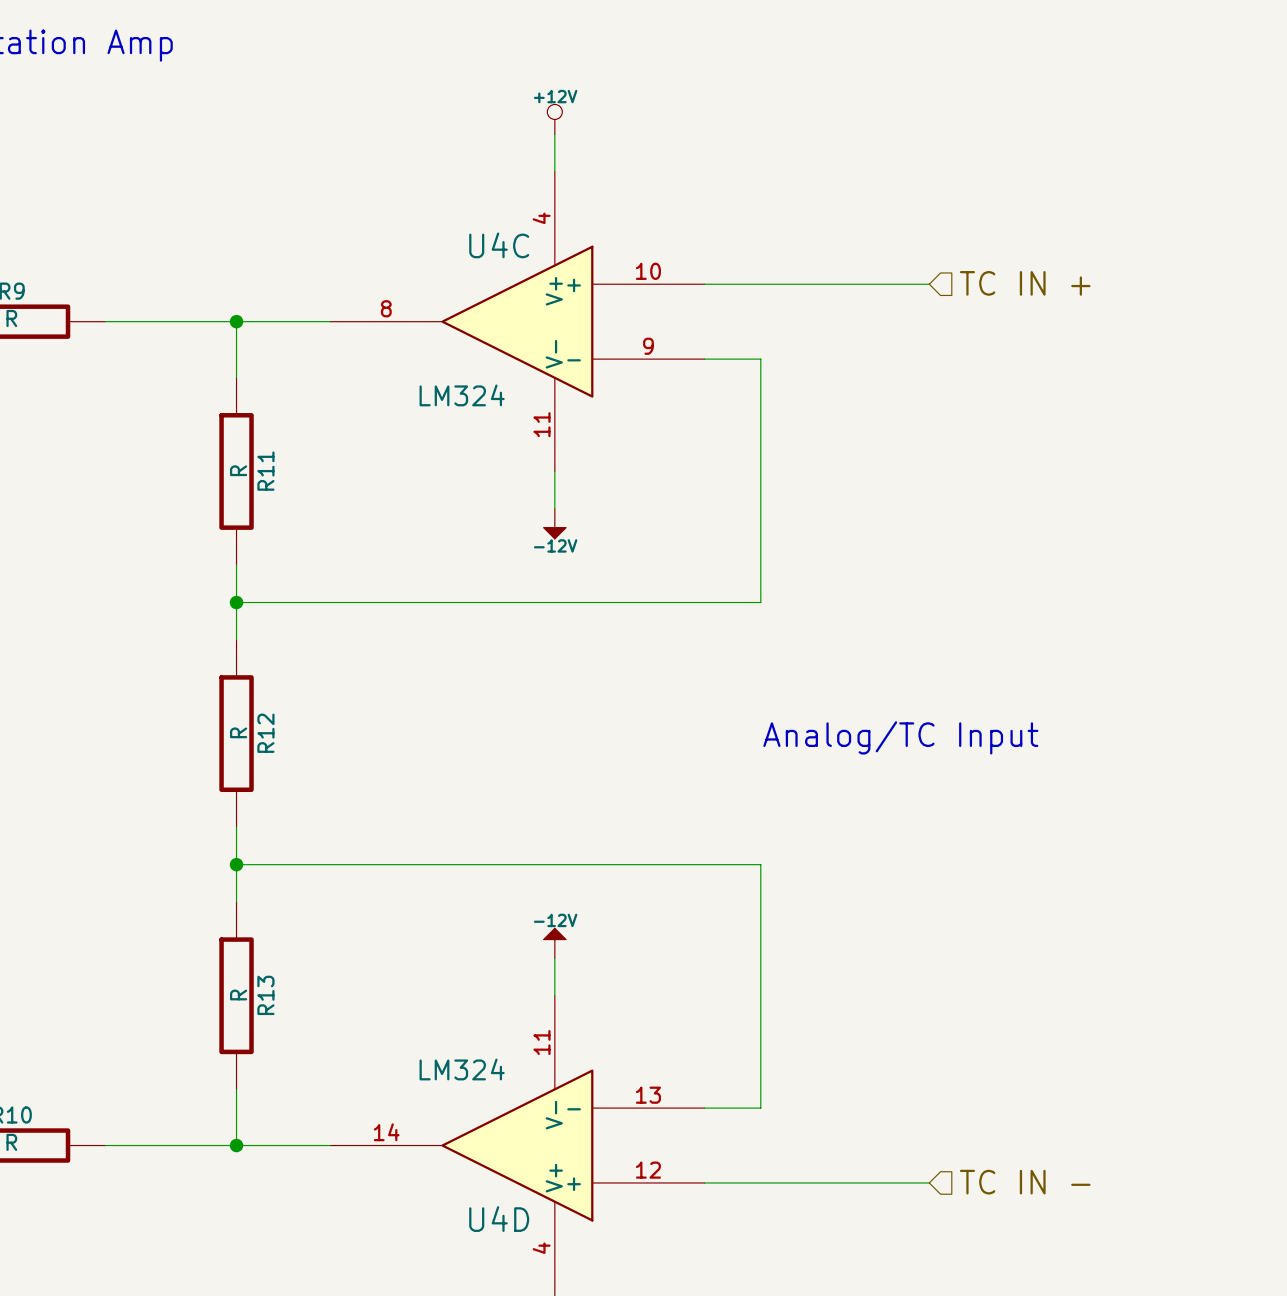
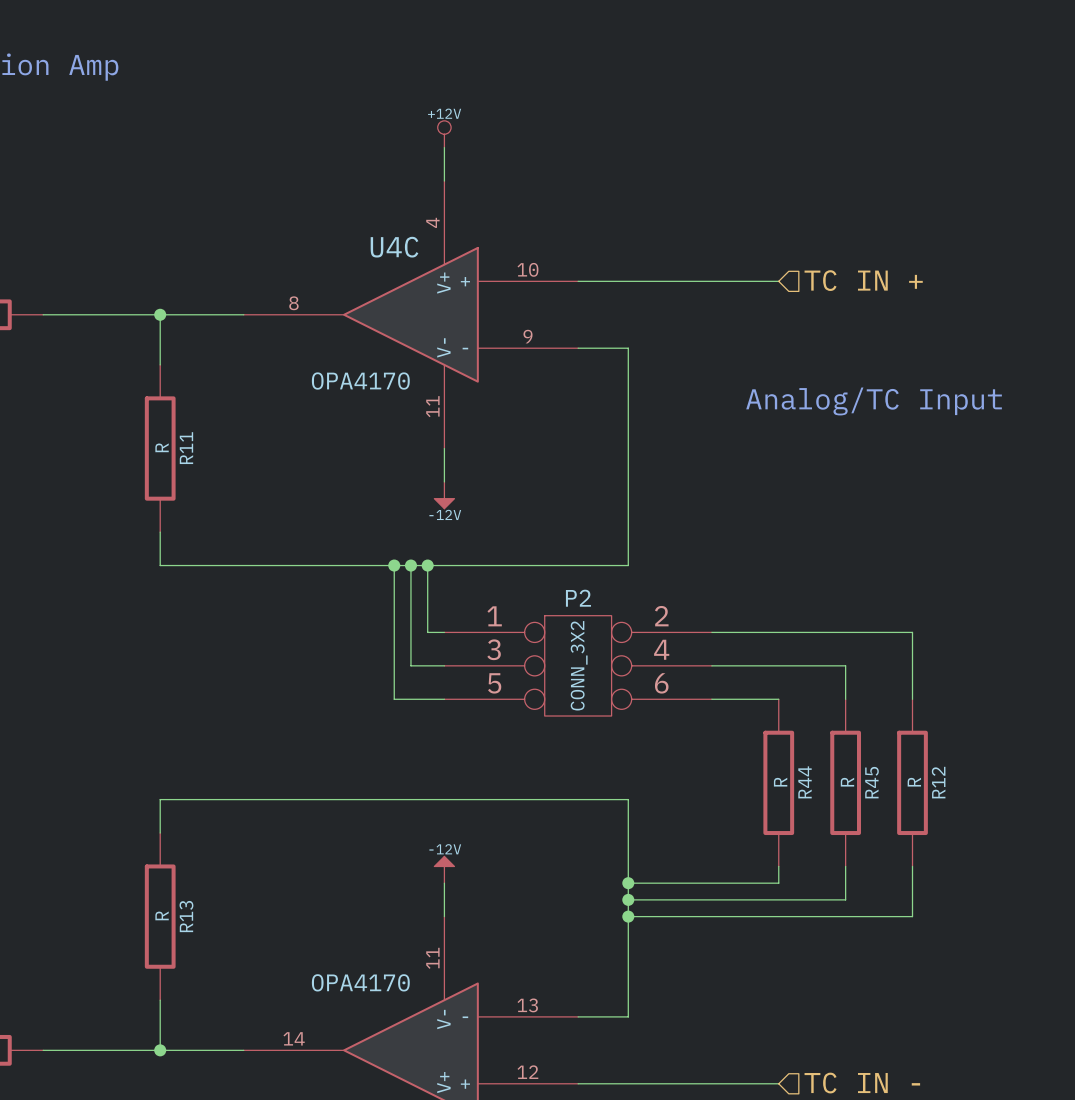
U4C value: LM324 (462, 395) -> OPA4170 (360, 381)
wire: (236, 602) (236, 639) -> none
junction: (236, 602) -> none
wire: none -> (394, 565) (394, 699) (444, 699)
junction: none -> (394, 565)
wire: none -> (410, 565) (410, 665) (444, 665)
junction: none -> (410, 565)
wire: none -> (427, 565) (427, 632) (444, 632)
junction: none -> (427, 565)
wire: none -> (711, 632) (912, 632) (912, 699)
P2: none -> CONN_3X2 (578, 665)
wire: none -> (711, 665) (845, 665) (845, 699)
R12 position: (236, 733) -> (912, 782)
text position: Analog/TC Input (900, 737) -> Analog/TC Input (874, 401)
wire: none -> (711, 699) (778, 699)
wire: (236, 827) (236, 864) -> none
R44: none -> R (778, 782)
R45: none -> R (845, 782)
junction: (236, 864) -> none
wire: none -> (778, 866) (778, 883) (628, 883)
wire: none -> (845, 866) (845, 899) (628, 899)
wire: none -> (912, 866) (912, 916) (628, 916)
junction: none -> (628, 883)
junction: none -> (628, 899)
junction: none -> (628, 916)
U4D value: LM324 (462, 1069) -> OPA4170 (360, 982)

